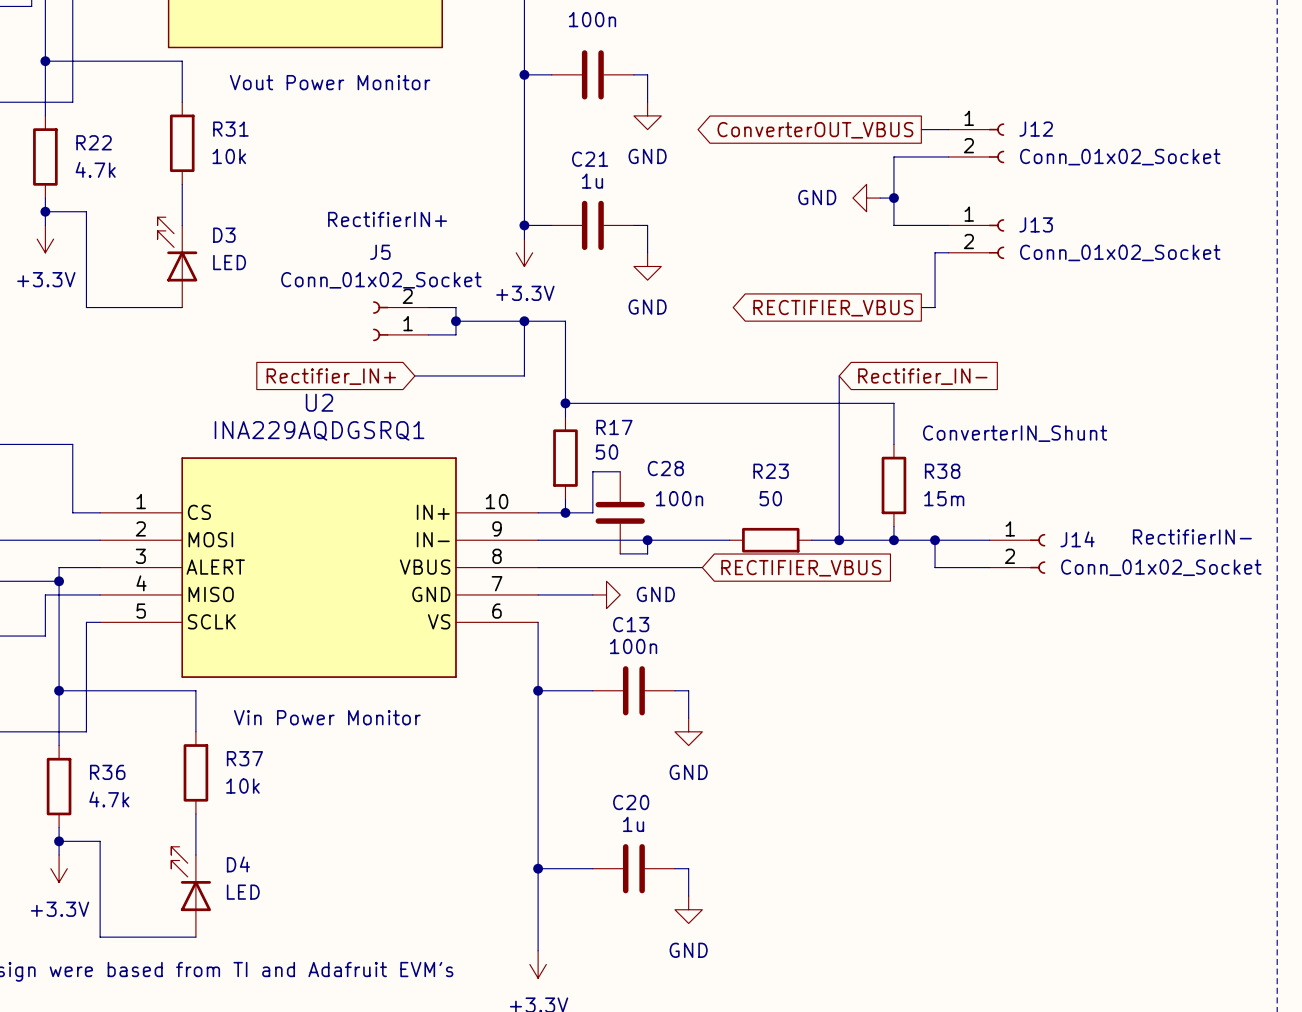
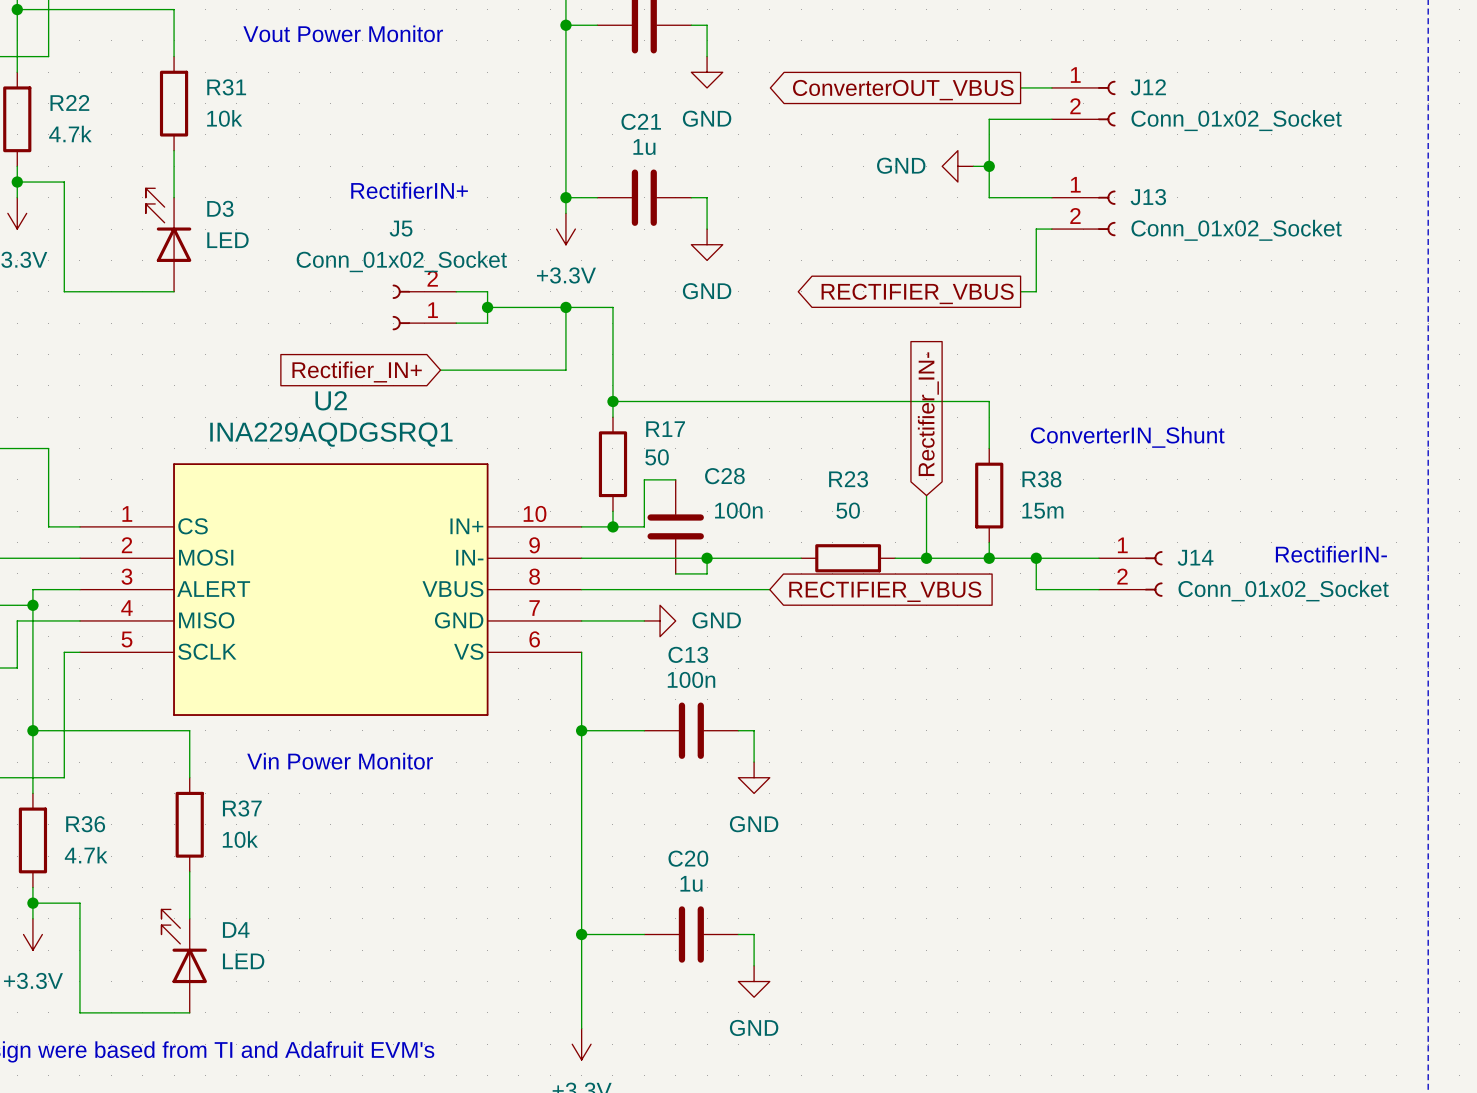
wire: (839, 375) (839, 485) -> none
global label rotation: 0° (922, 376) -> 90° counterclockwise (928, 414)

